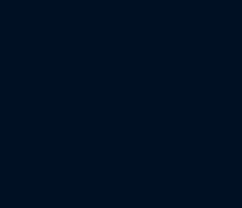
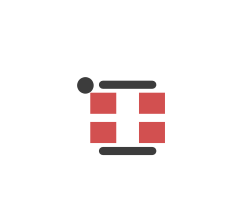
part: none -> (121, 116)

